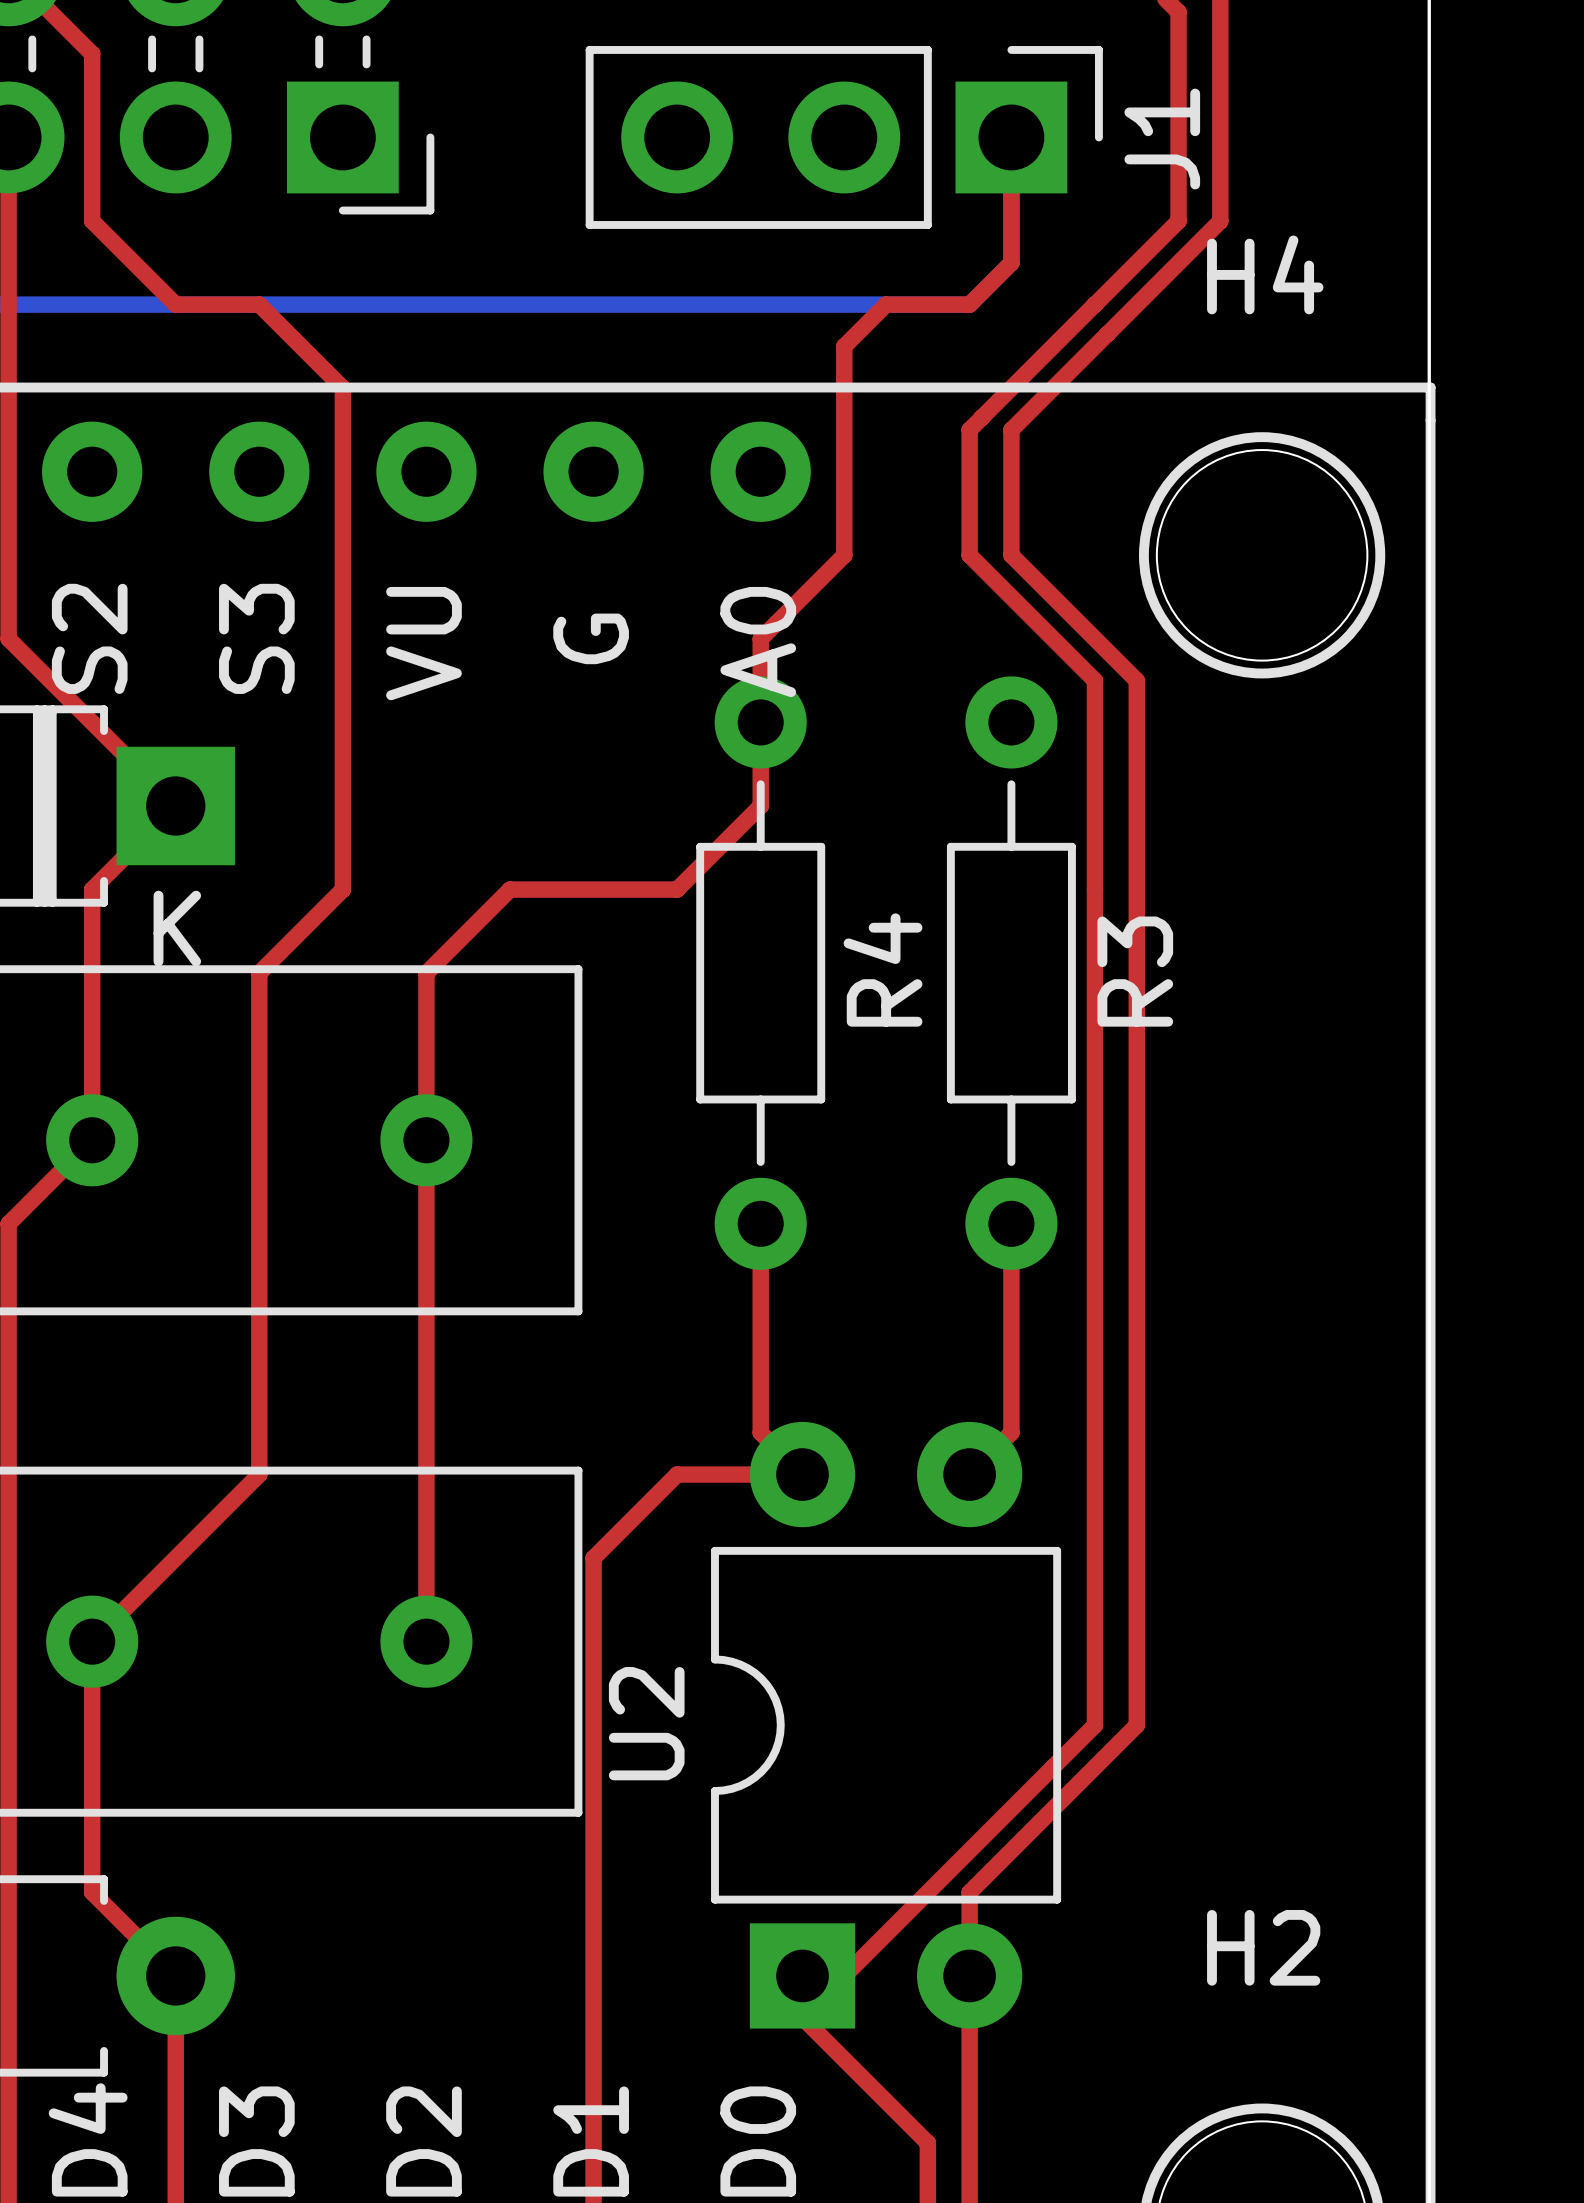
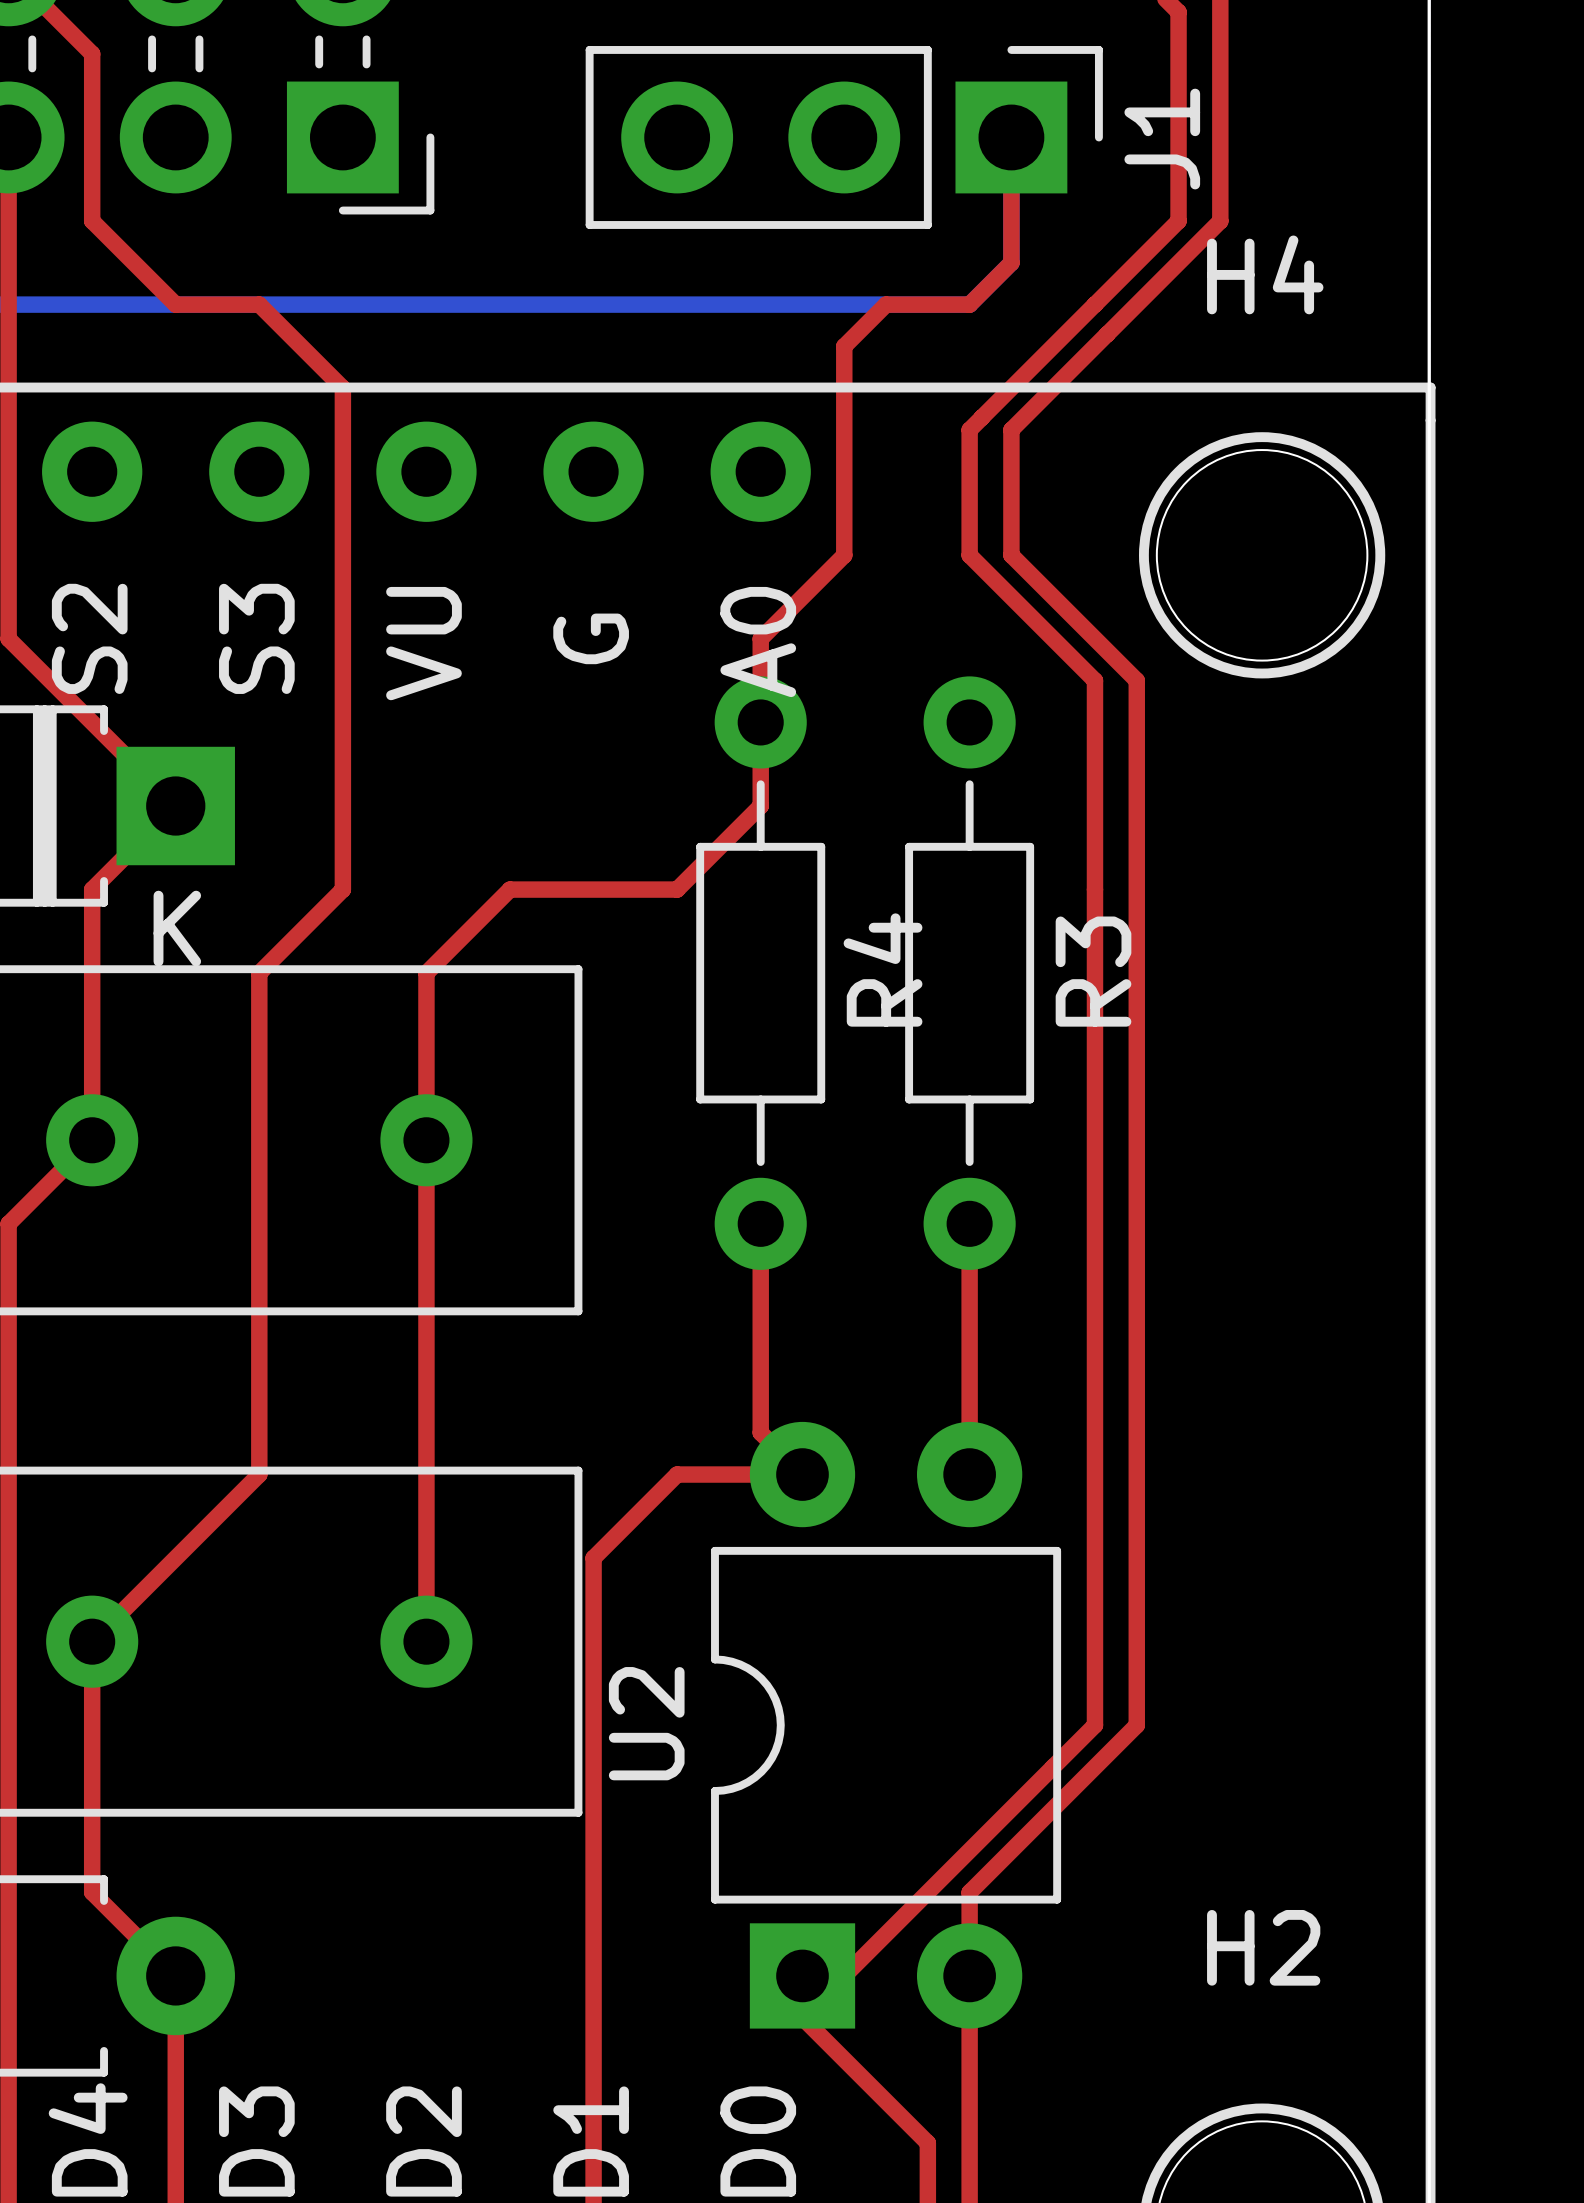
R3 position: (1011, 973) -> (969, 973)
top track: (1011, 1223) (1011, 1432) (969, 1474) -> (969, 1223) (969, 1474)

